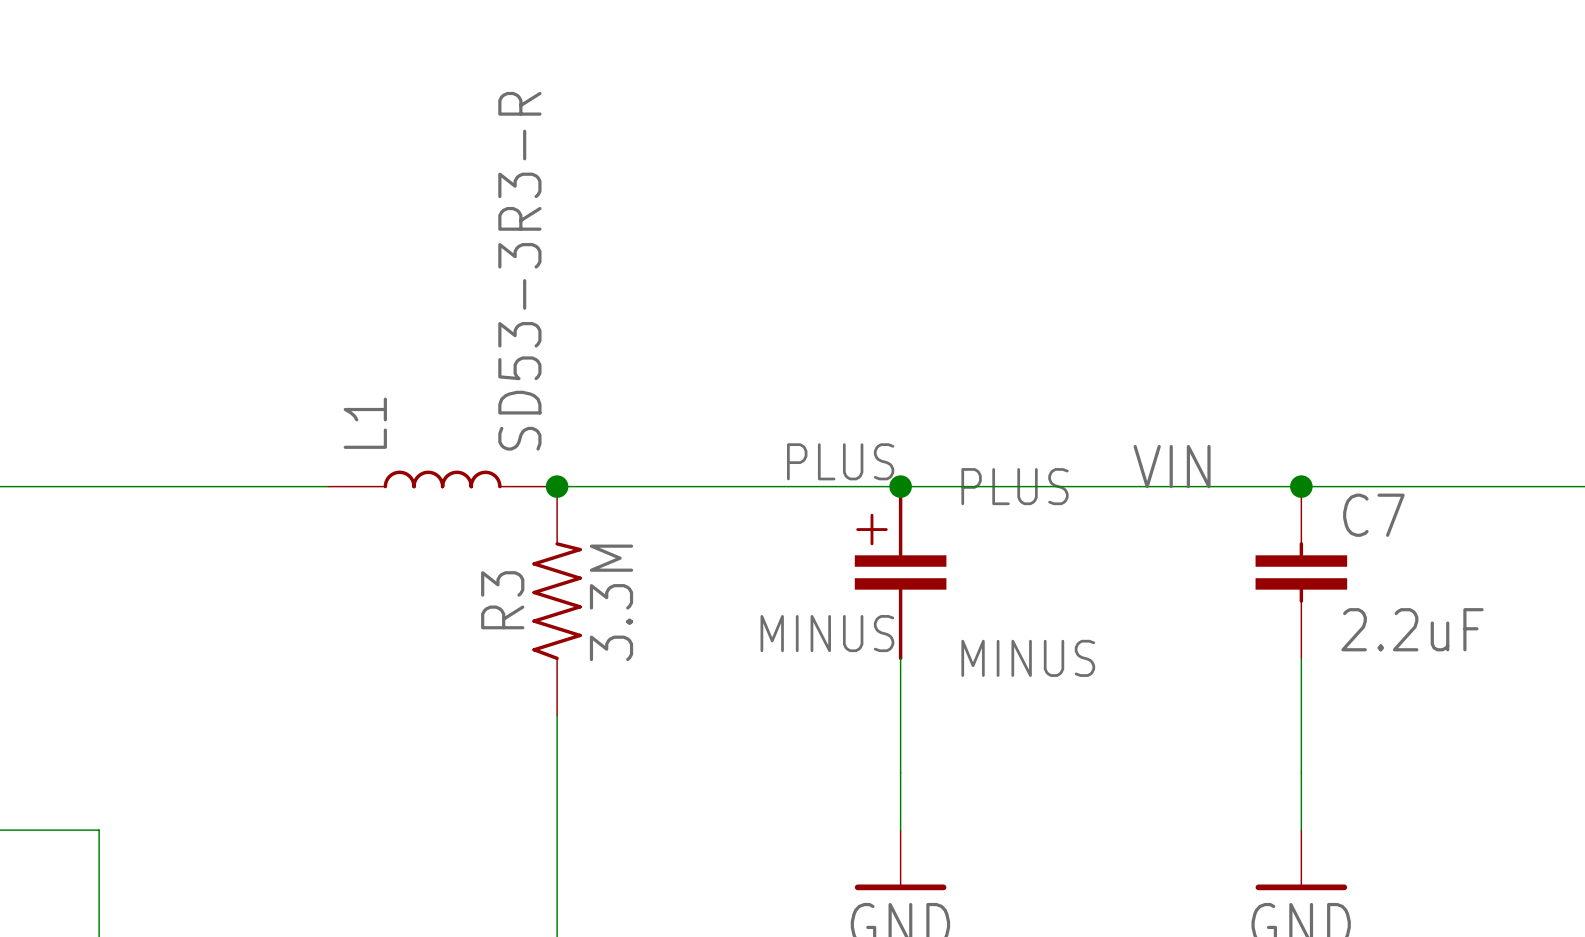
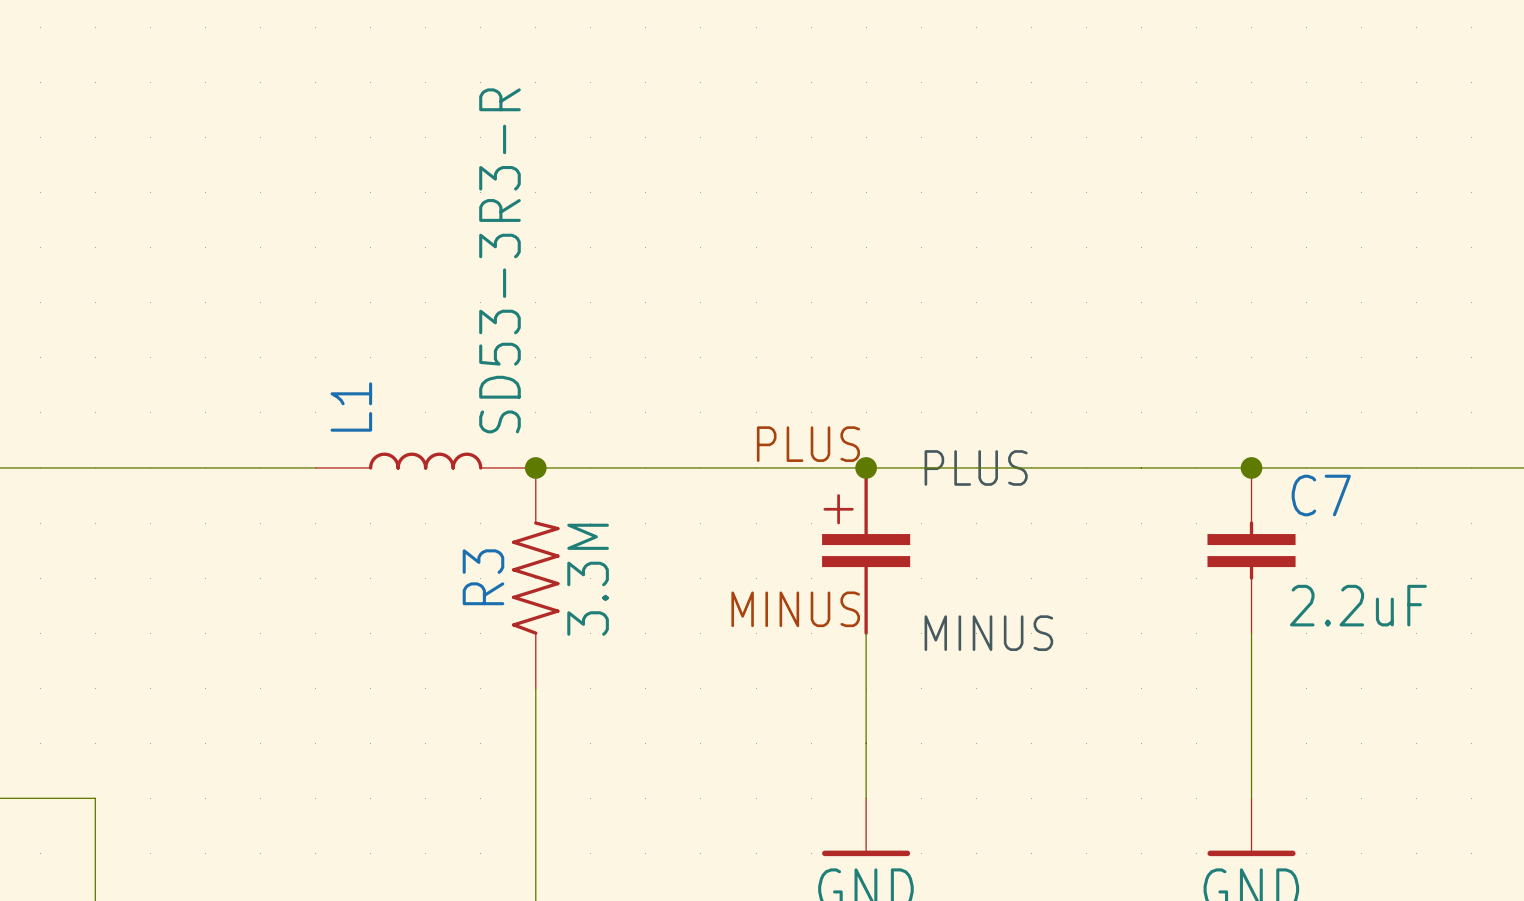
label: VIN (1172, 466) -> none

